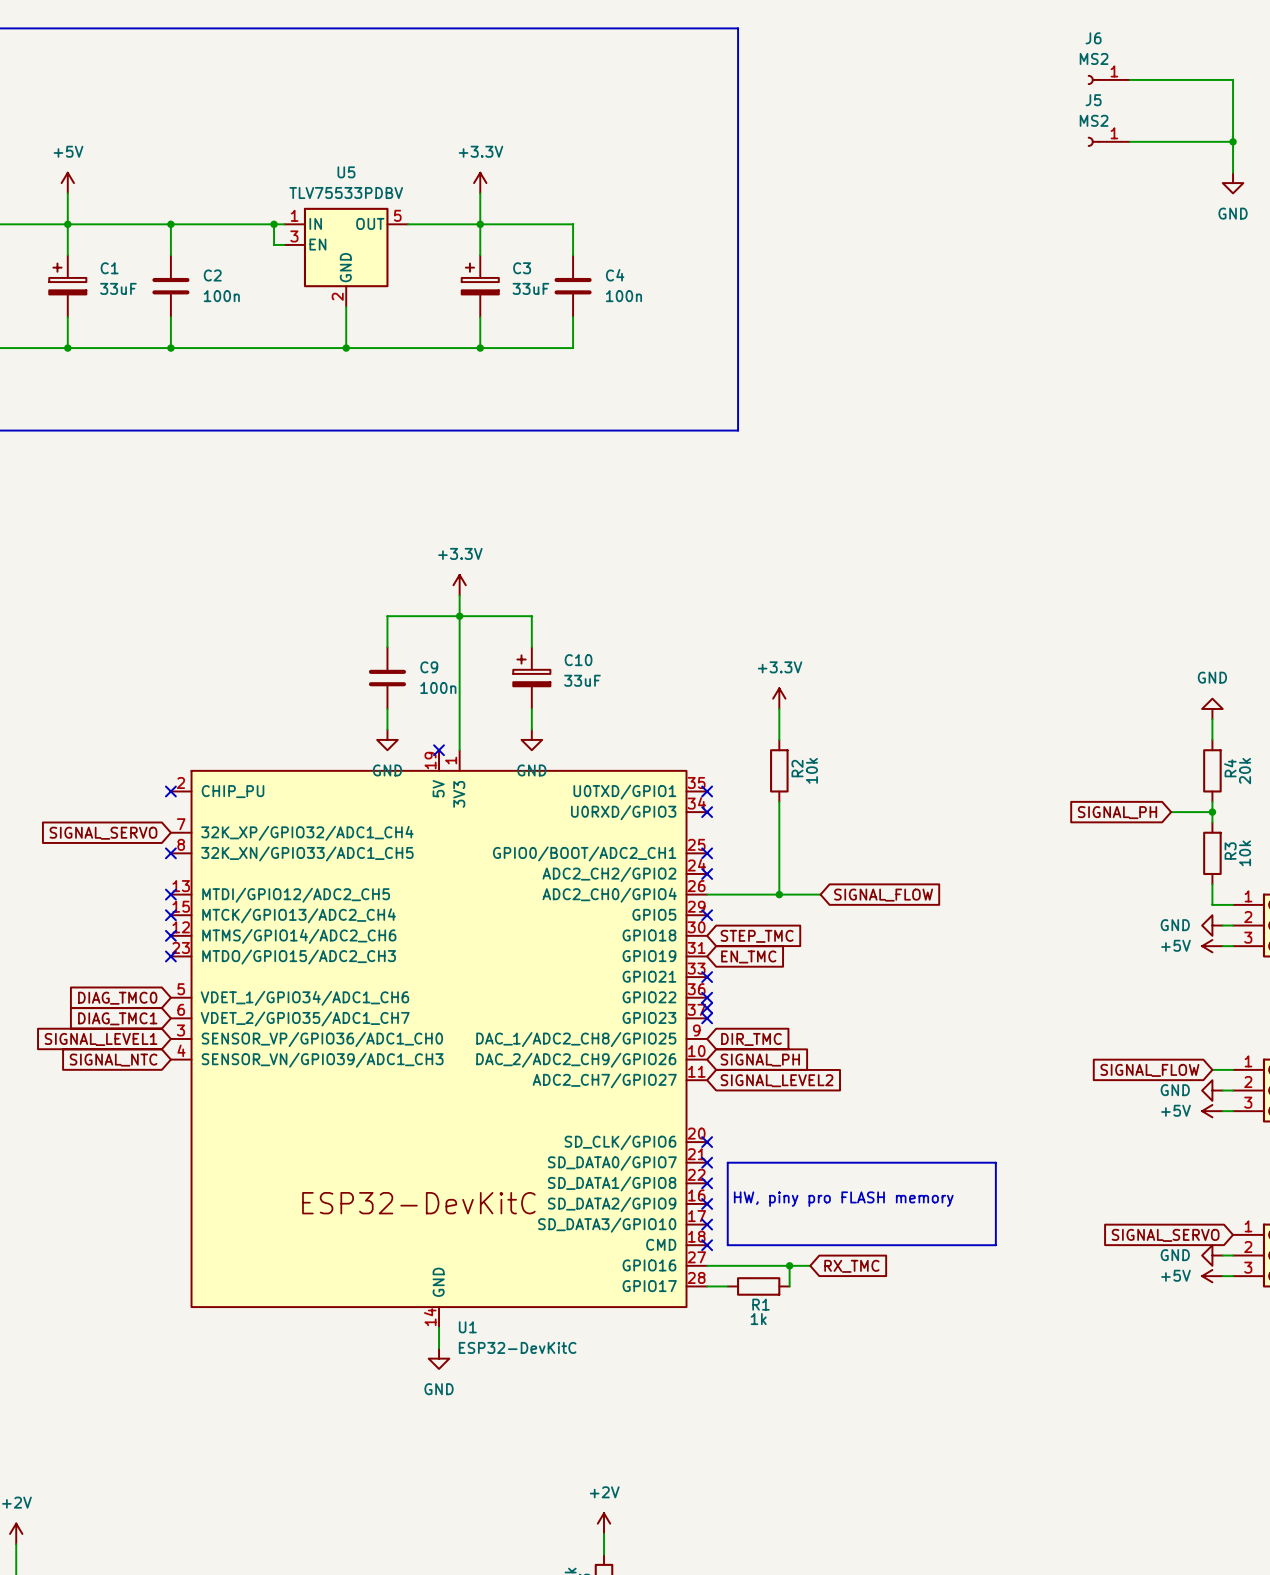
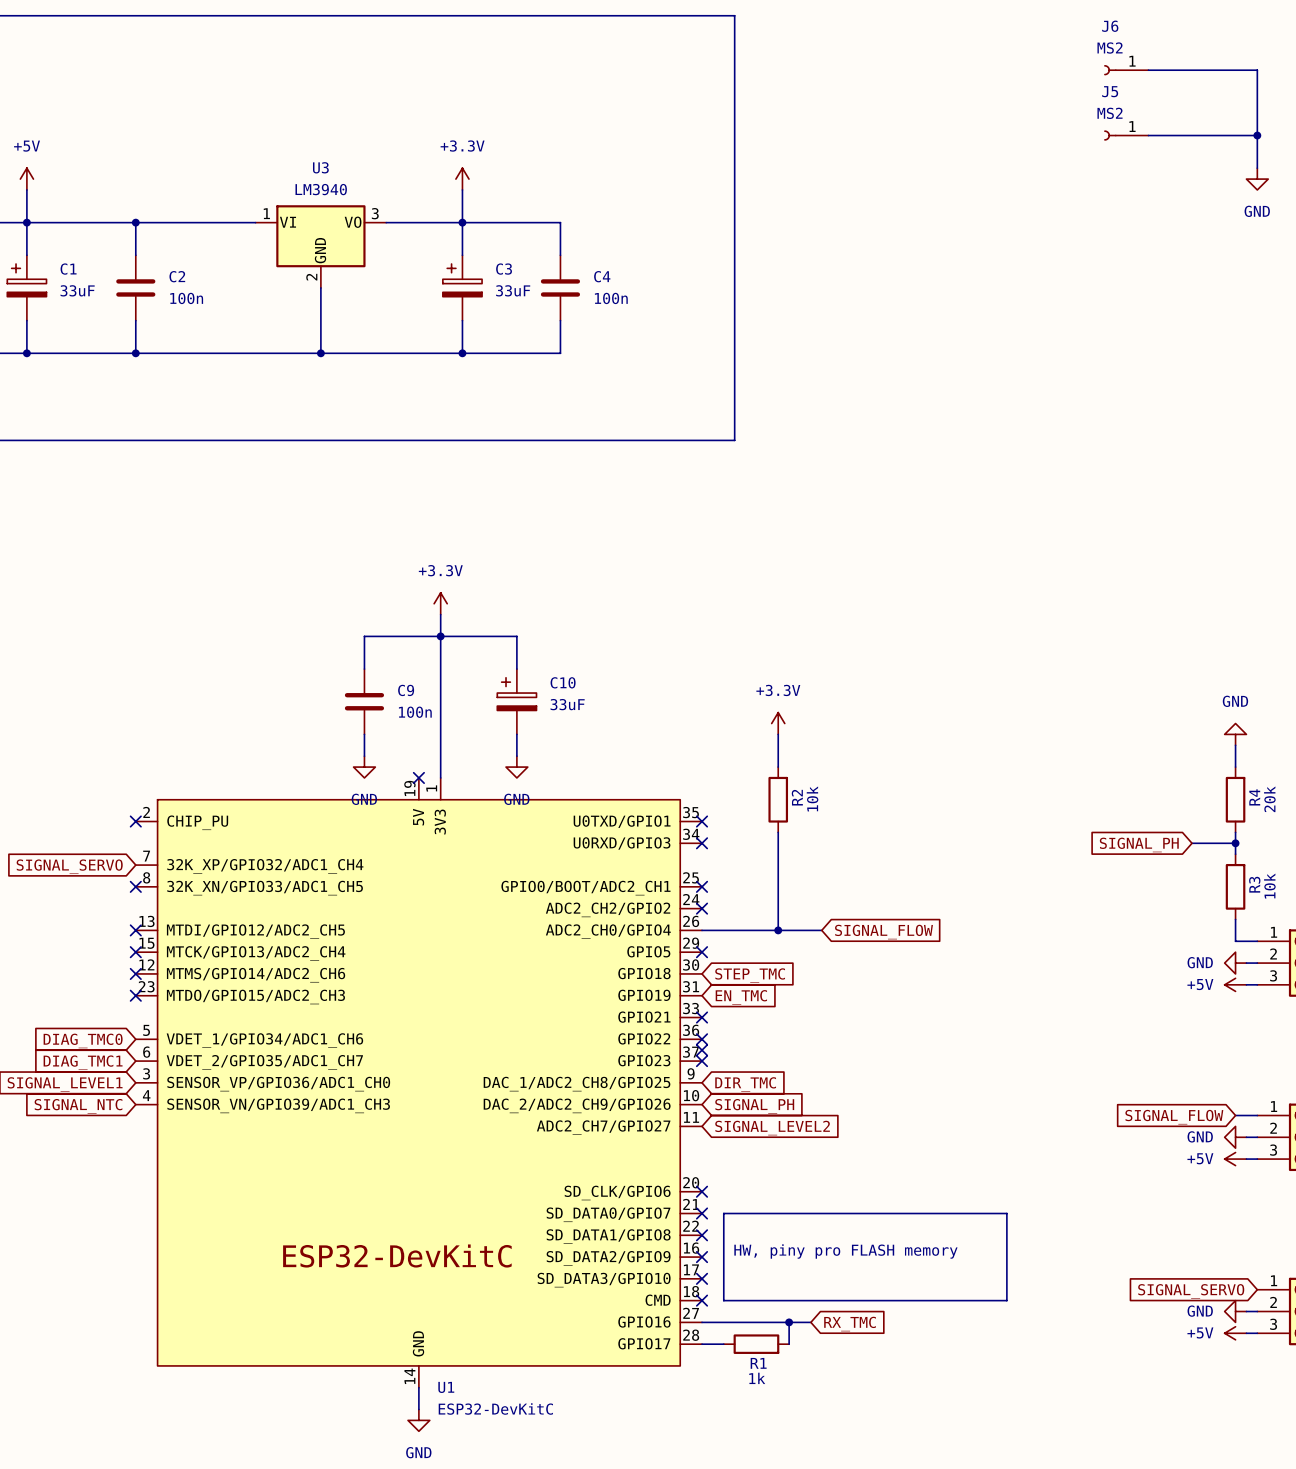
wire: (274, 224) (274, 244) (284, 244) -> none
junction: (274, 224) -> none
U3: none -> LM3940 (320, 246)
U5: TLV75533PDBV (346, 257) -> none

